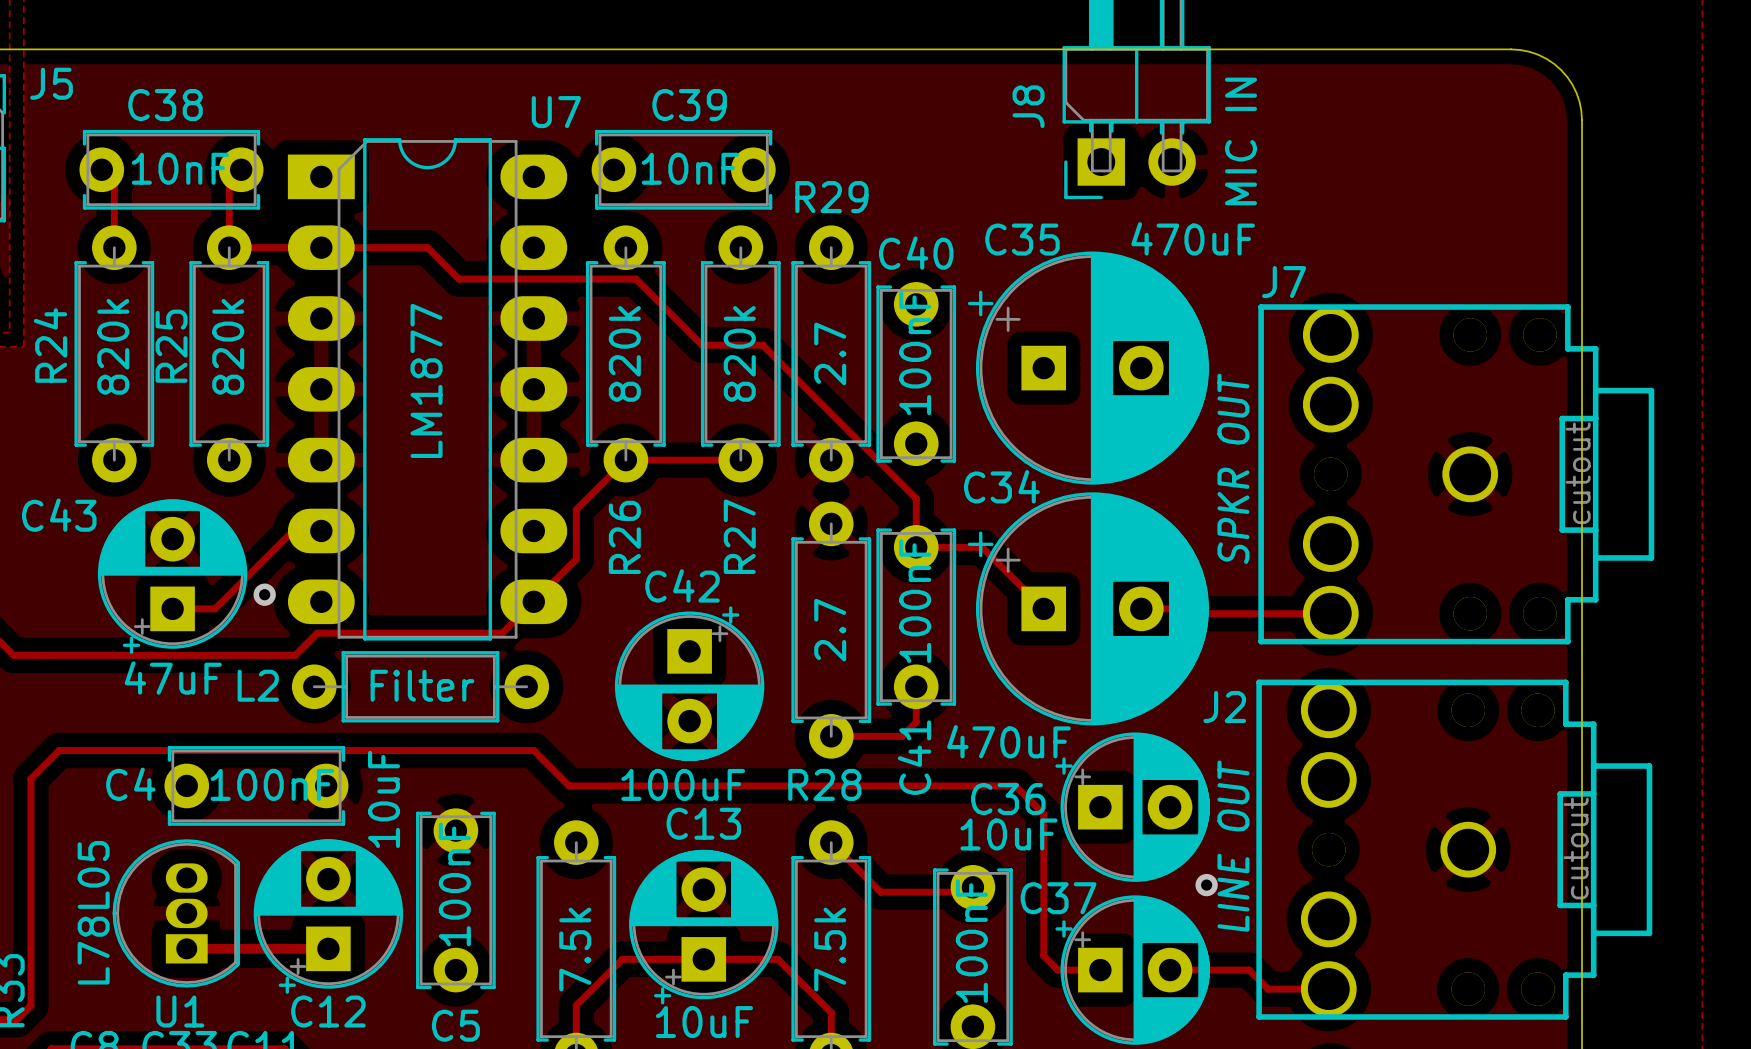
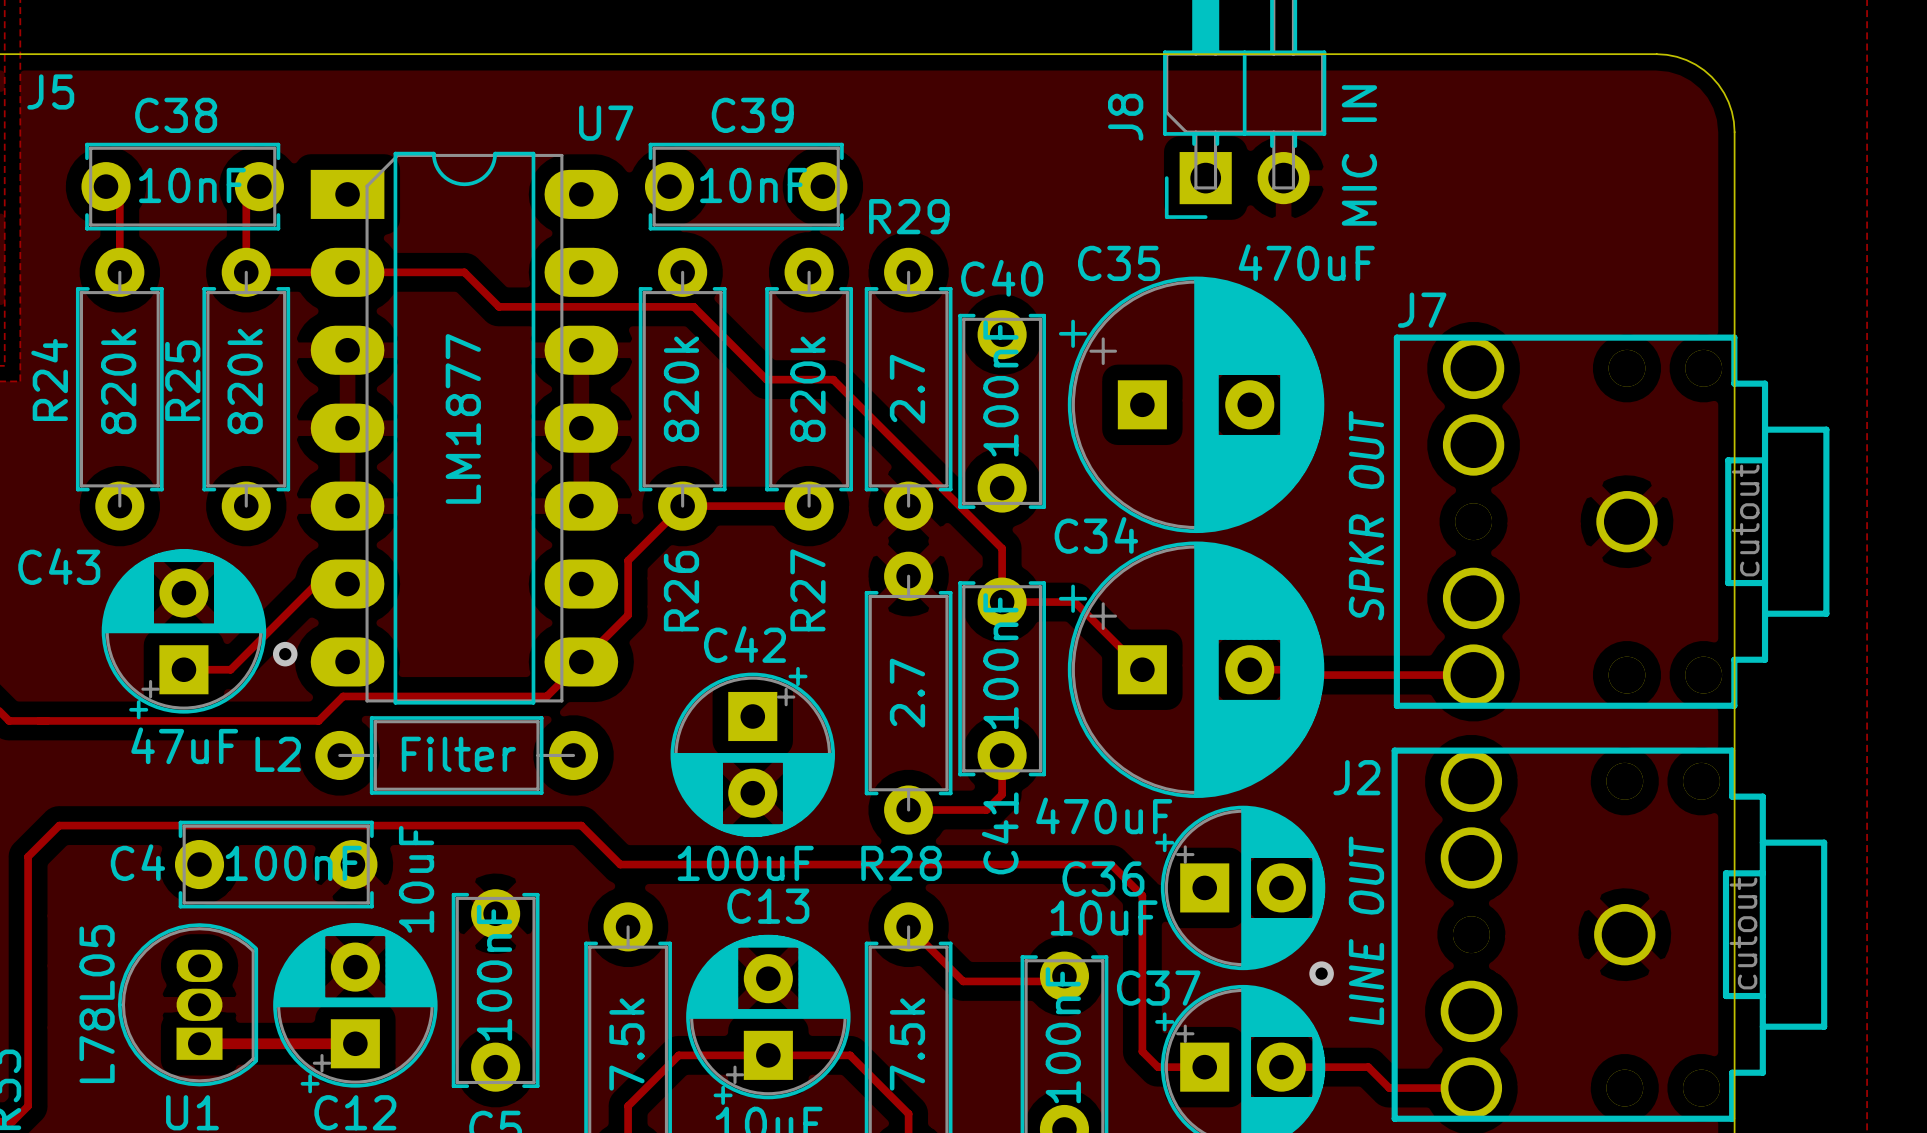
J7 position: (1456, 474) -> (1611, 521)
J2 position: (1454, 849) -> (1609, 934)

